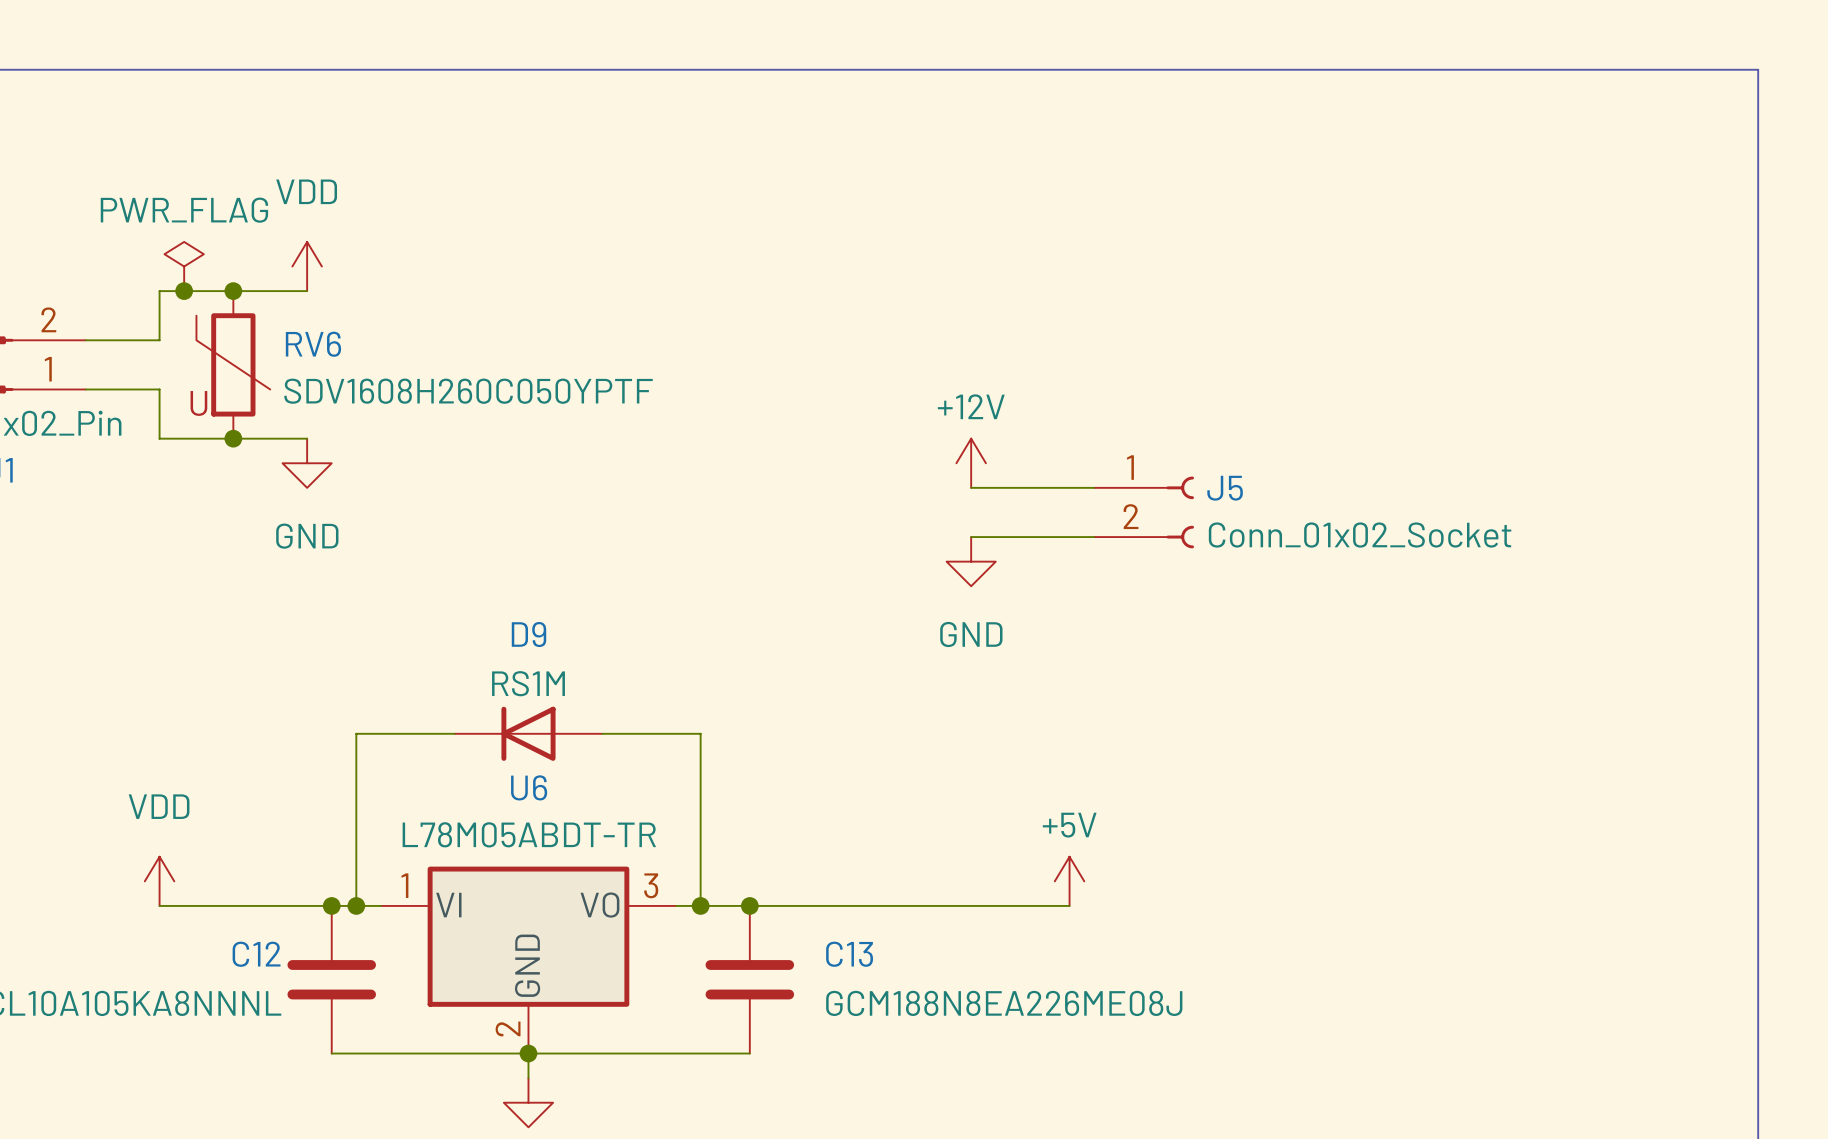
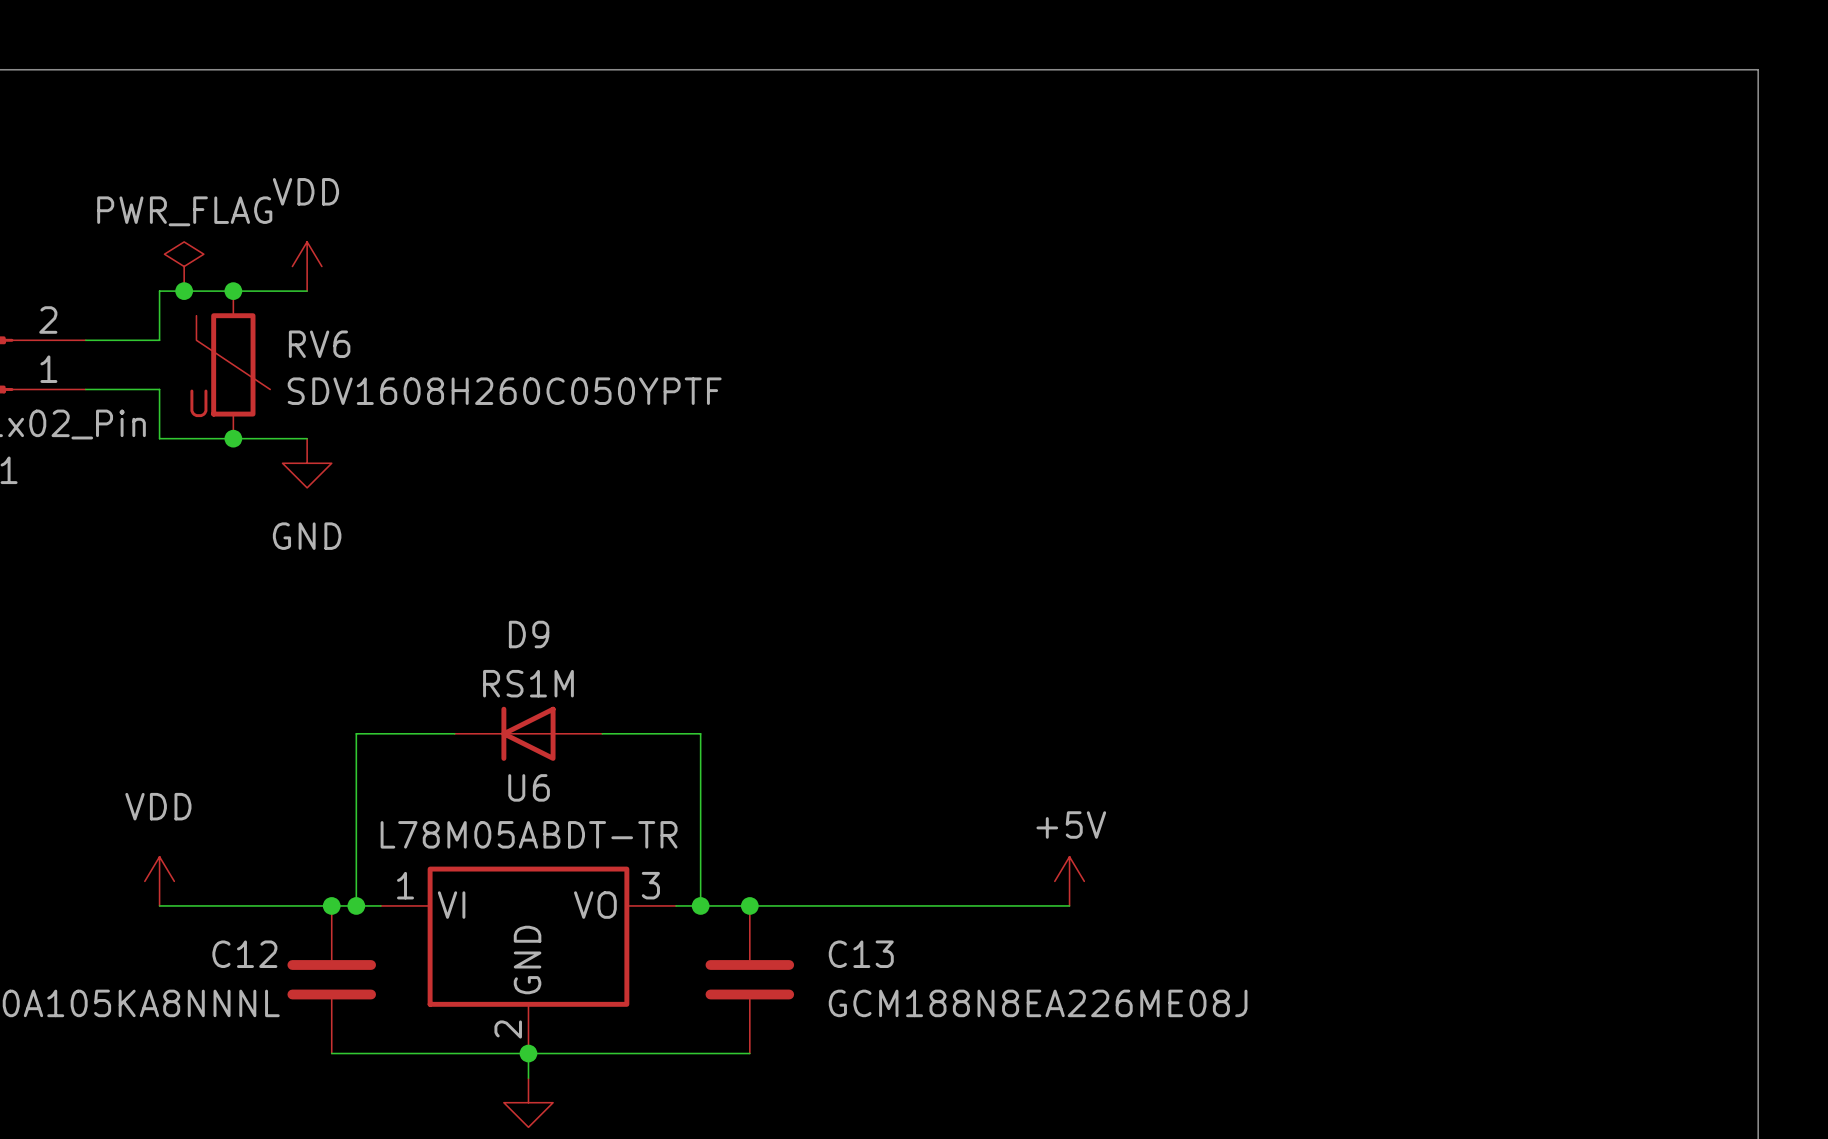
power symbol: +12V (971, 463) -> none
wire: (971, 487) (1094, 487) -> none
J5: Conn_01x02_Socket (1144, 512) -> none
wire: (971, 537) (1094, 537) -> none
power symbol: GND (971, 561) -> none

